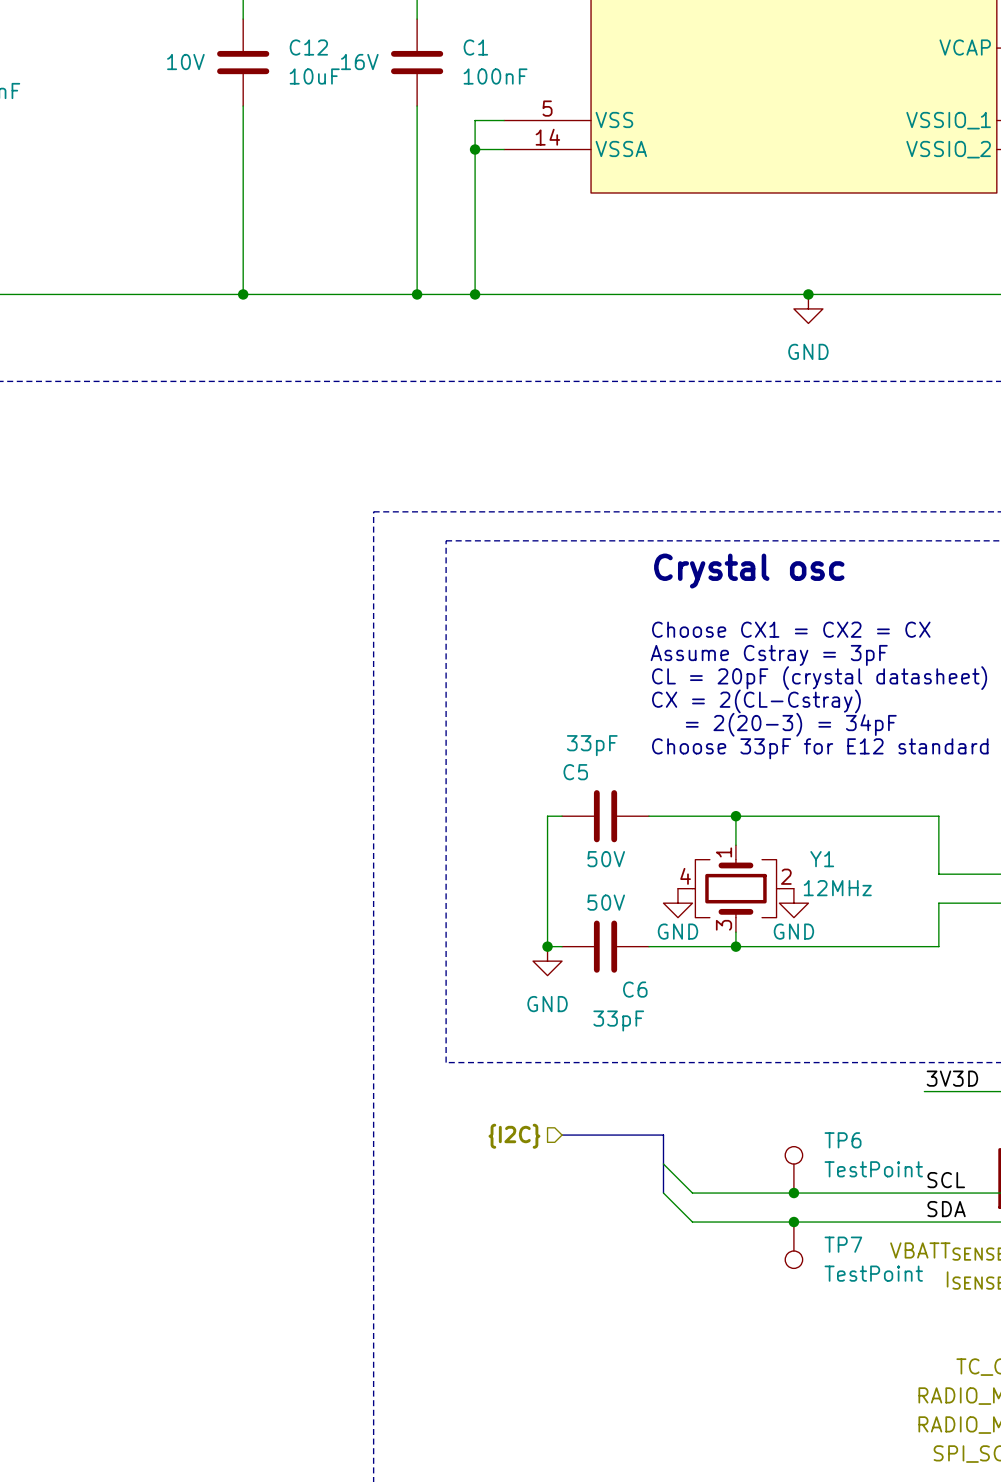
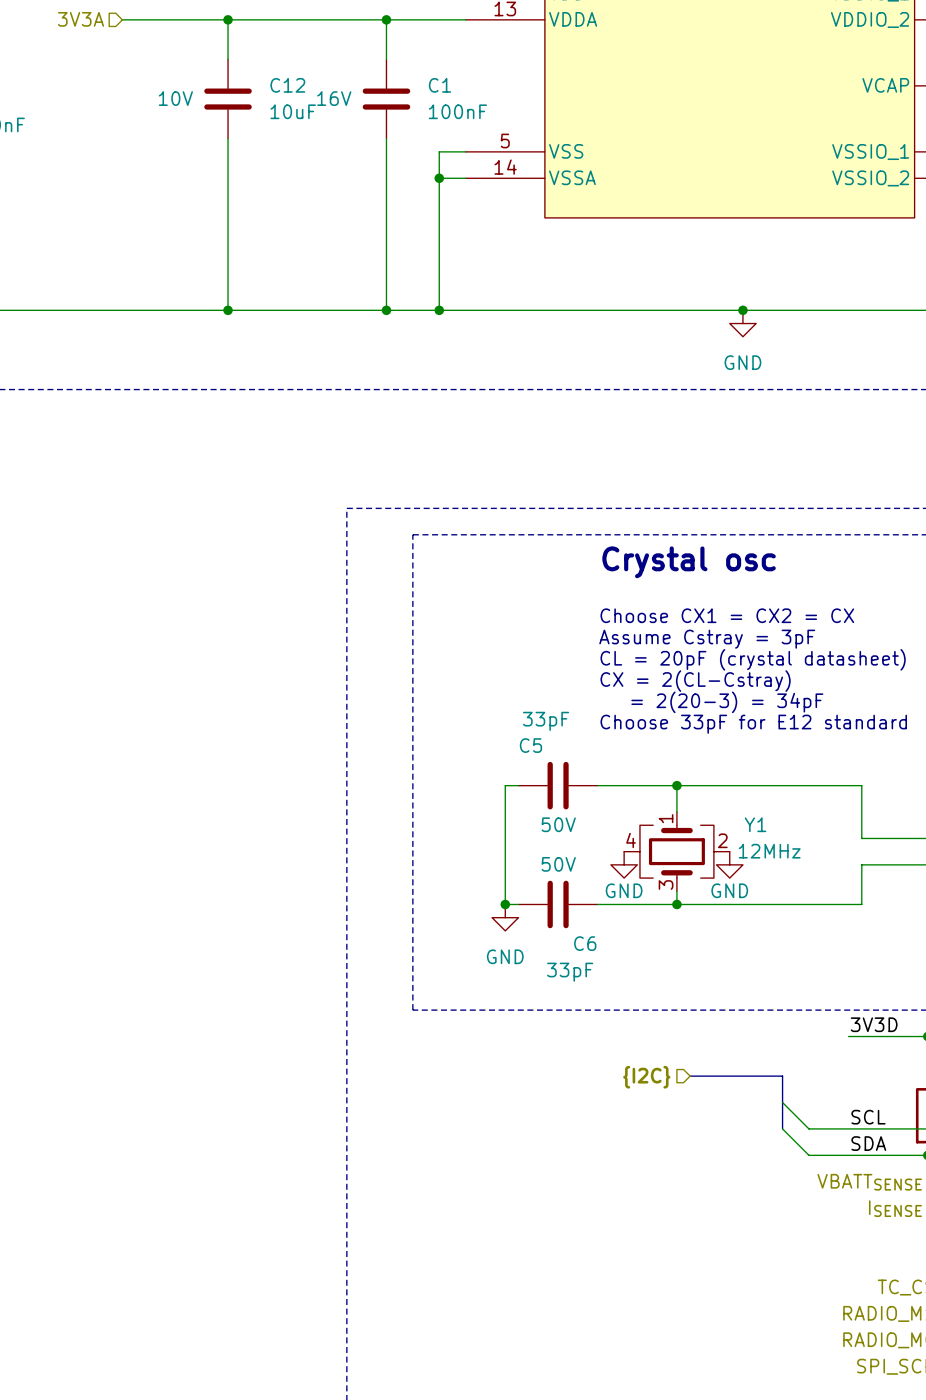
bus: (562, 1135) (663, 1135) (663, 1193) -> (690, 1076) (782, 1076) (782, 1128)
hierarchical label position: {I2C} (514, 1136) -> {I2C} (646, 1077)
wire: (663, 1164) (692, 1193) (880, 1193) -> (782, 1102) (808, 1128)
TP6: TestPoint (793, 1169) -> none
wire: (663, 1193) (692, 1222) (880, 1222) -> (782, 1128) (808, 1155)
junction: (793, 1193) -> none
junction: (793, 1222) -> none
TP7: TestPoint (793, 1245) -> none

